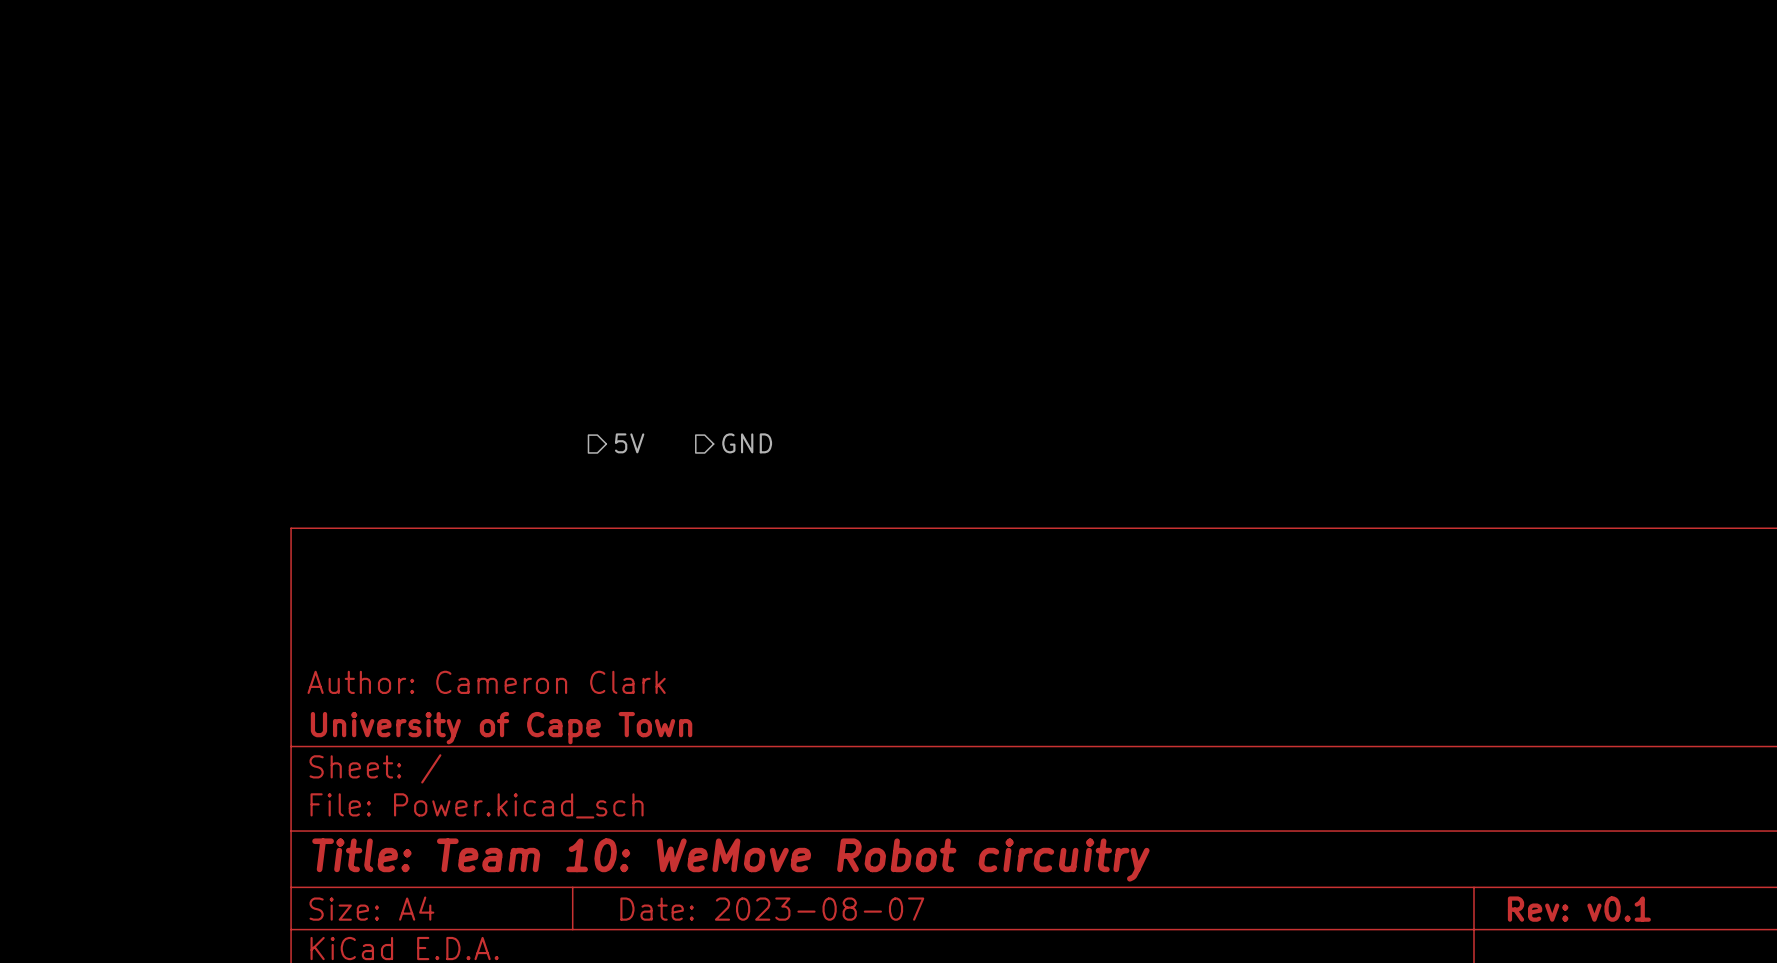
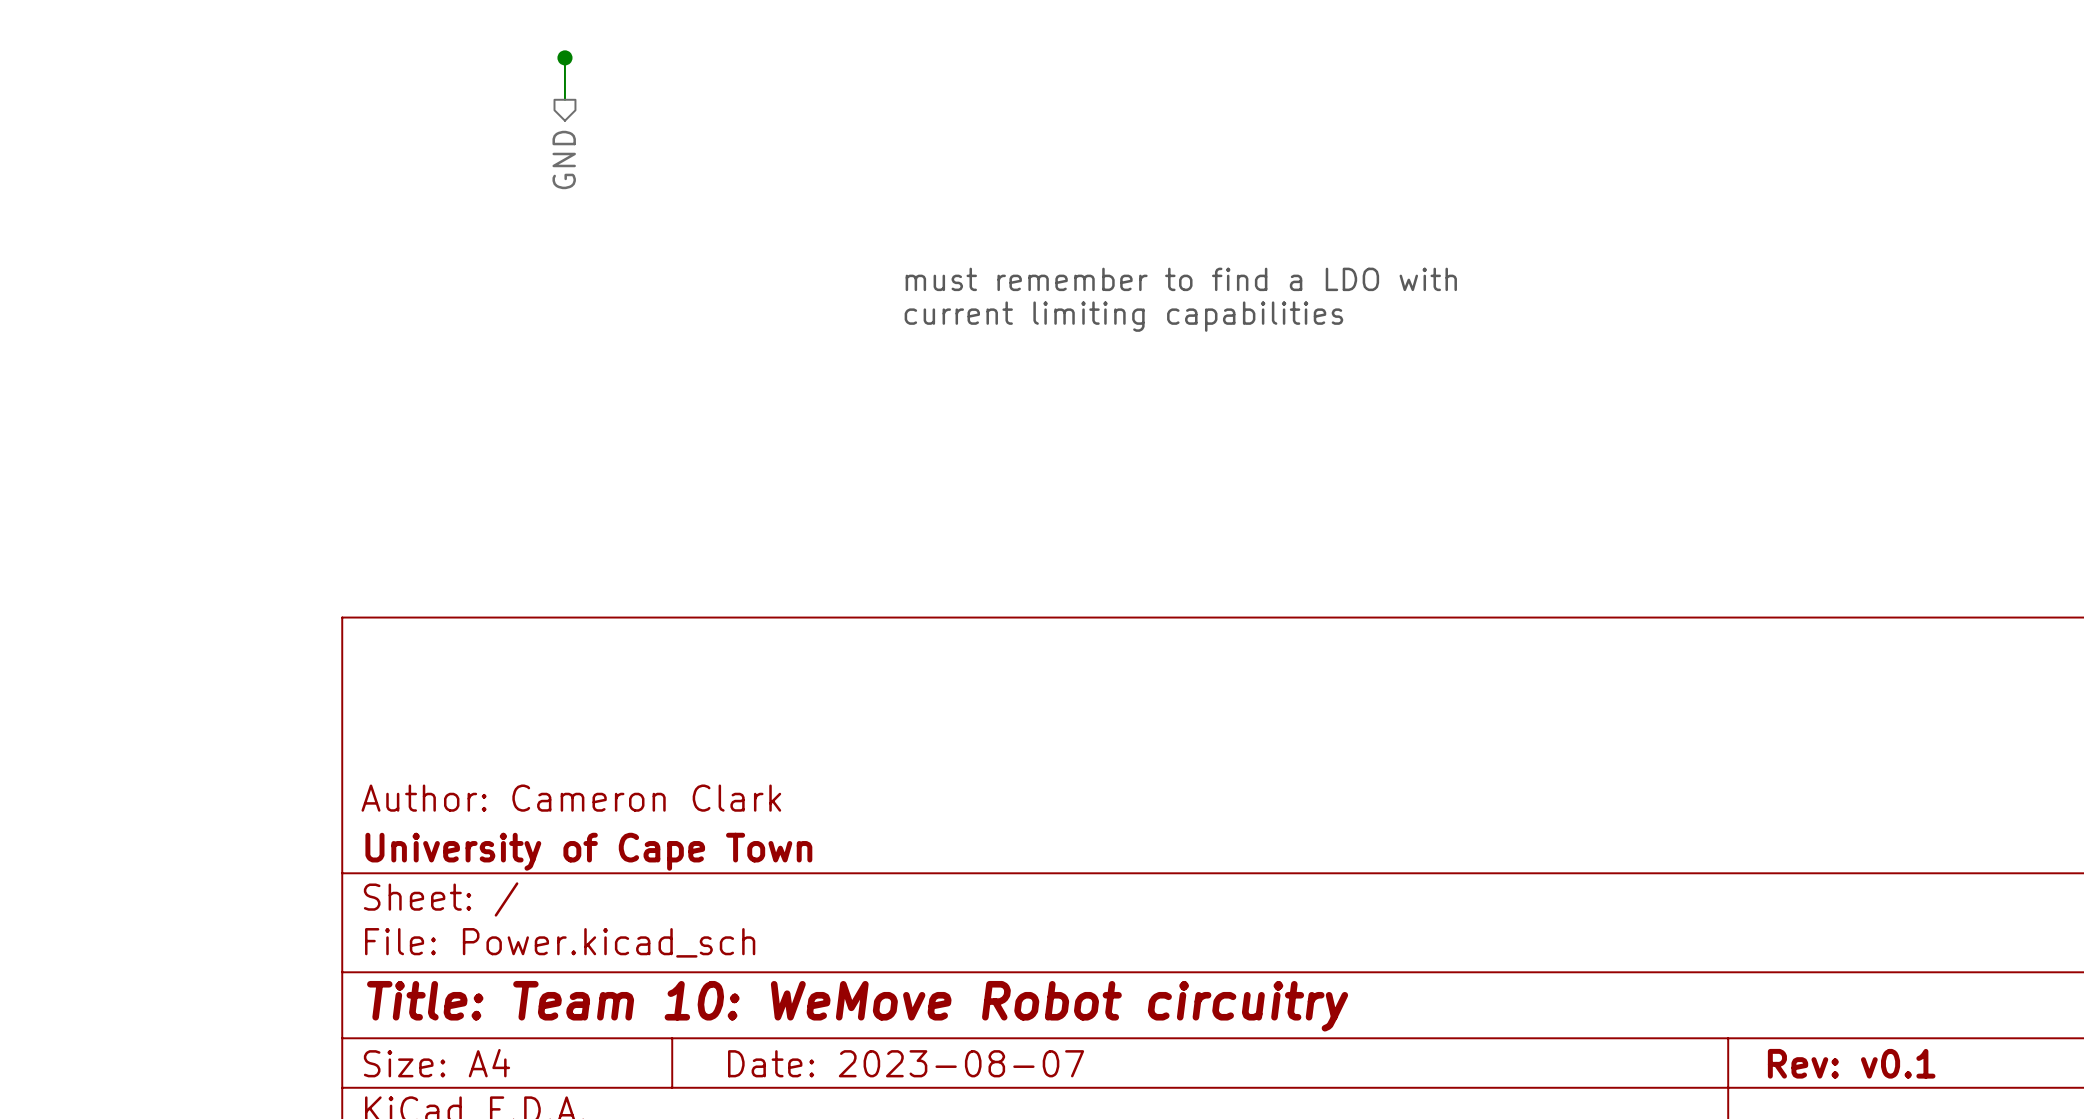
wire: none -> (564, 57) (564, 99)
junction: none -> (564, 57)
hierarchical label: none -> GND (564, 159)
text: none -> must remember to find a LDO with (1181, 279)
text: none -> current limiting capabilities (1123, 316)
hierarchical label: 5V (629, 443) -> none
hierarchical label: GND (747, 443) -> none

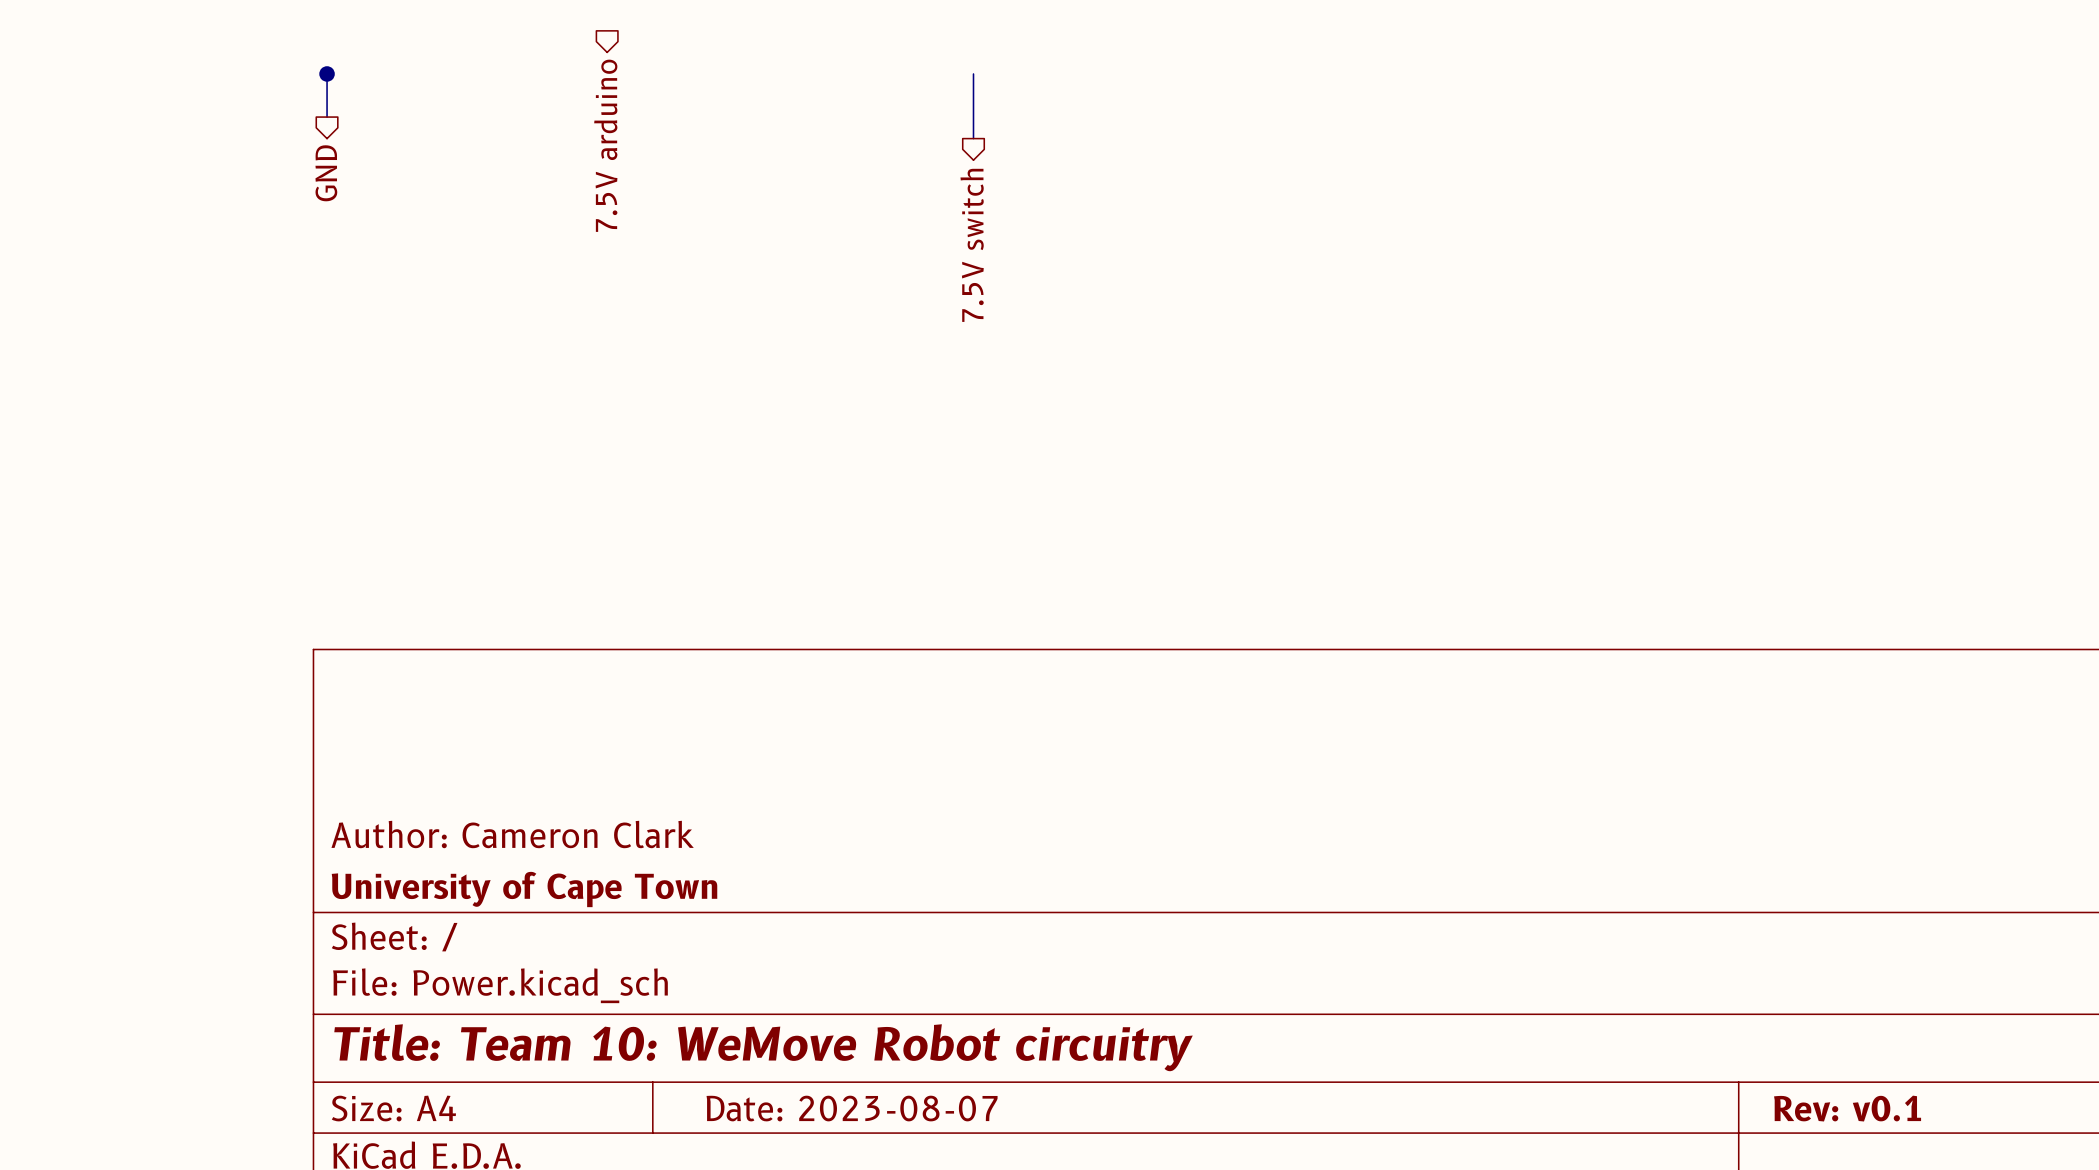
junction: none -> (327, 73)
wire: (564, 57) (564, 99) -> (327, 73) (327, 117)
junction: (564, 57) -> none
wire: none -> (973, 73) (973, 138)
hierarchical label: none -> 7.5V arduino (605, 145)
hierarchical label position: GND (564, 159) -> GND (326, 173)
hierarchical label: none -> 7.5V switch (972, 245)
text: must remember to find a LDO with (1181, 279) -> none
text: current limiting capabilities (1123, 316) -> none

